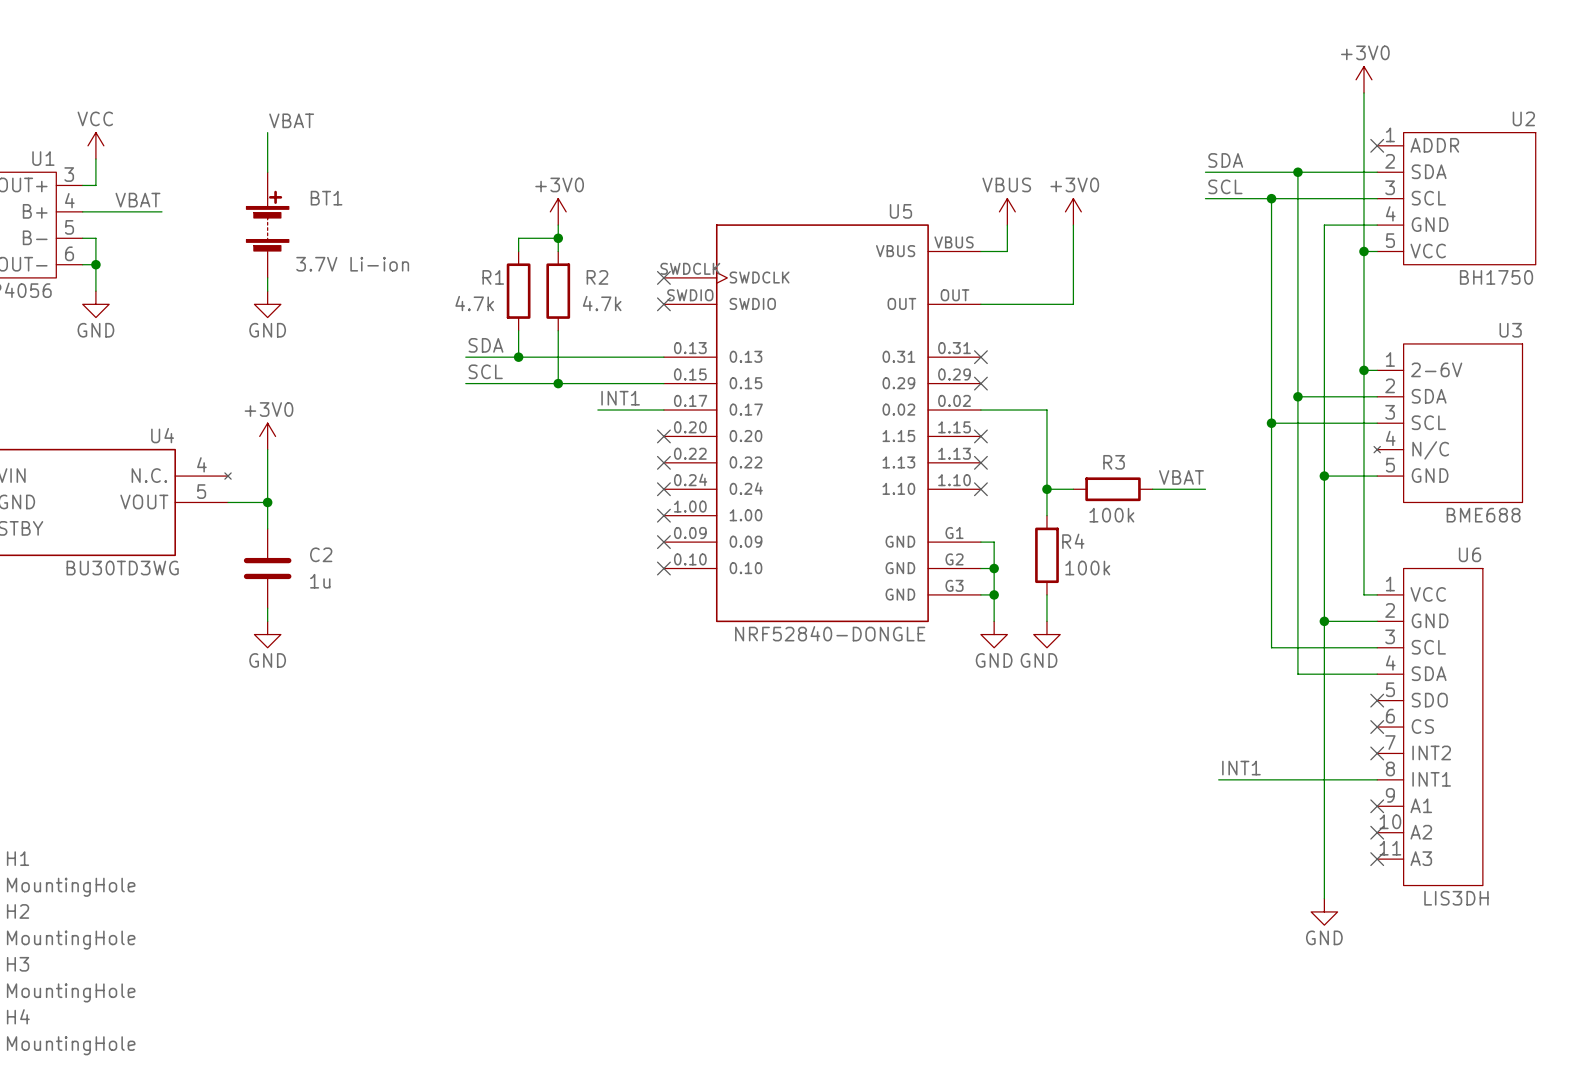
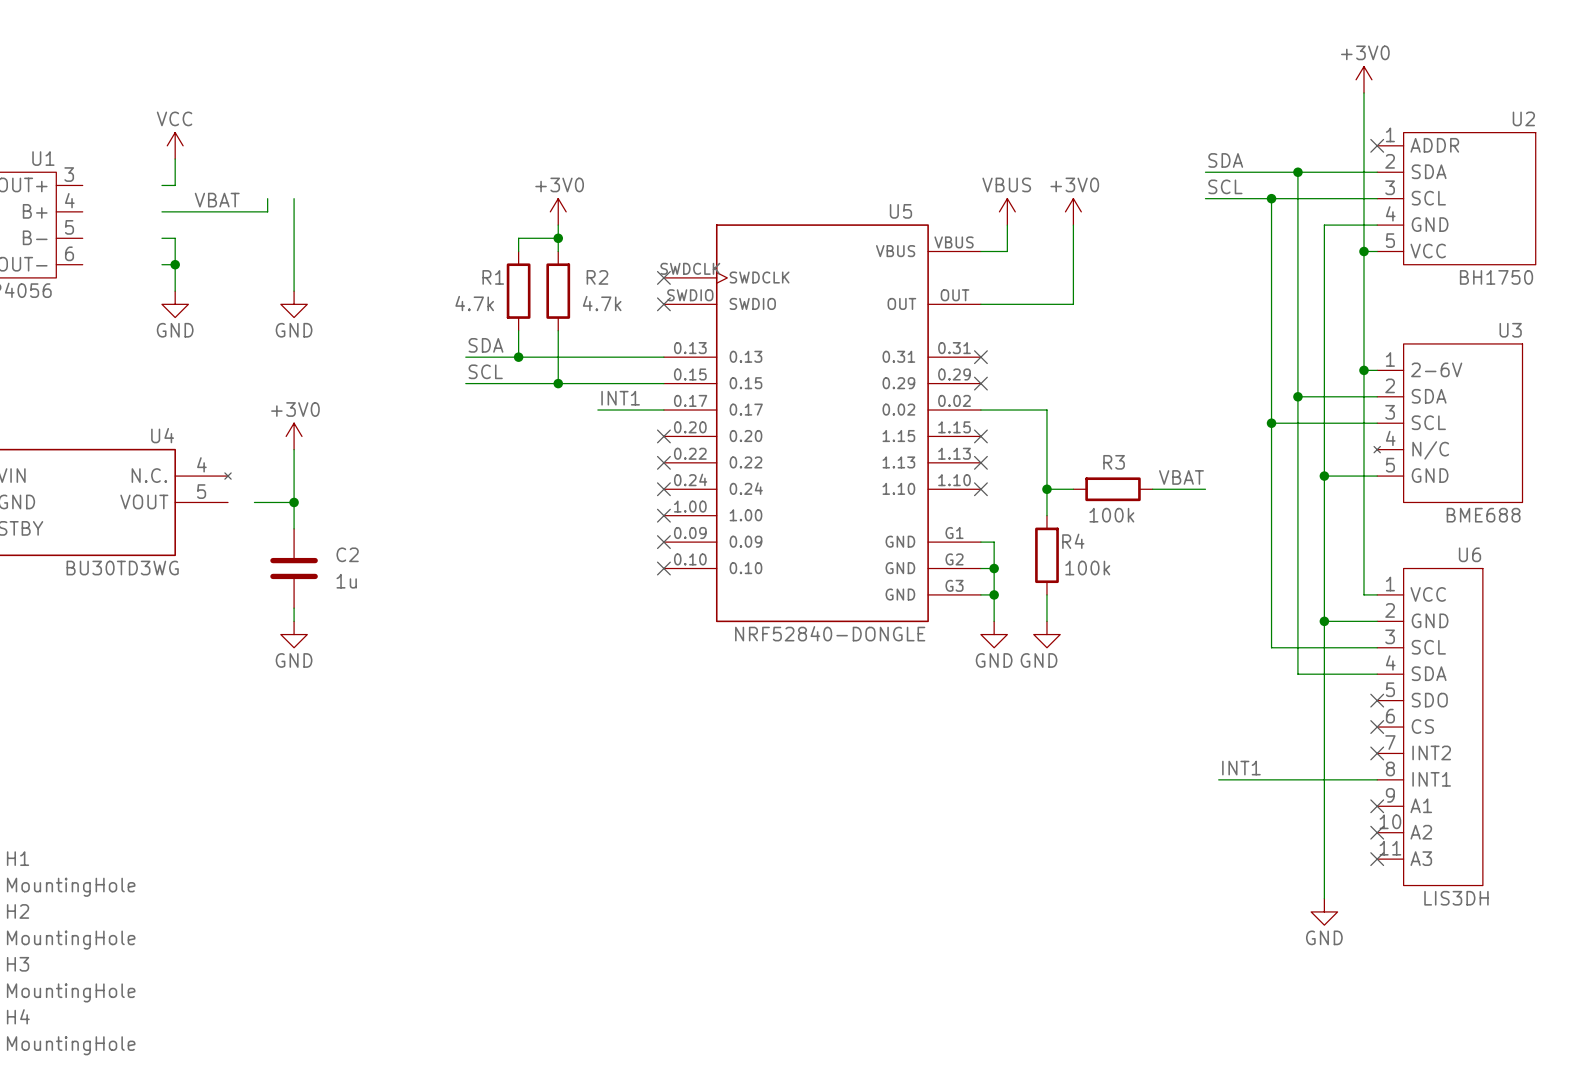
label: VBAT (291, 120) -> none
wire: (267, 132) (267, 172) -> none
power symbol position: VCC (95, 145) -> VCC (175, 145)
wire: (95, 159) (95, 185) (82, 185) -> (175, 159) (175, 185) (161, 185)
wire: none -> (294, 198) (294, 291)
label: VBAT (137, 200) -> none
label: none -> VBAT (217, 200)
wire: (82, 211) (161, 211) -> (267, 198) (267, 211) (161, 211)
BT1: 3.7V Li-ion (267, 225) -> none
wire: (82, 238) (95, 238) (95, 291) -> (161, 238) (175, 238) (175, 291)
wire: (82, 264) (95, 264) -> (161, 264) (175, 264)
junction: (95, 264) -> none
junction: none -> (175, 264)
wire: (267, 277) (267, 291) -> none
power symbol: GND (95, 304) -> none
power symbol: none -> GND (175, 304)
power symbol position: GND (267, 304) -> GND (294, 304)
power symbol position: +3V0 (267, 436) -> +3V0 (294, 436)
wire: (267, 449) (267, 528) -> (294, 449) (294, 528)
wire: (228, 502) (254, 502) -> (267, 502) (294, 502)
junction position: (267, 502) -> (294, 502)
C2 position: (267, 568) -> (294, 568)
wire: (267, 608) (267, 621) -> (294, 608) (294, 621)
power symbol position: GND (267, 634) -> GND (294, 634)

